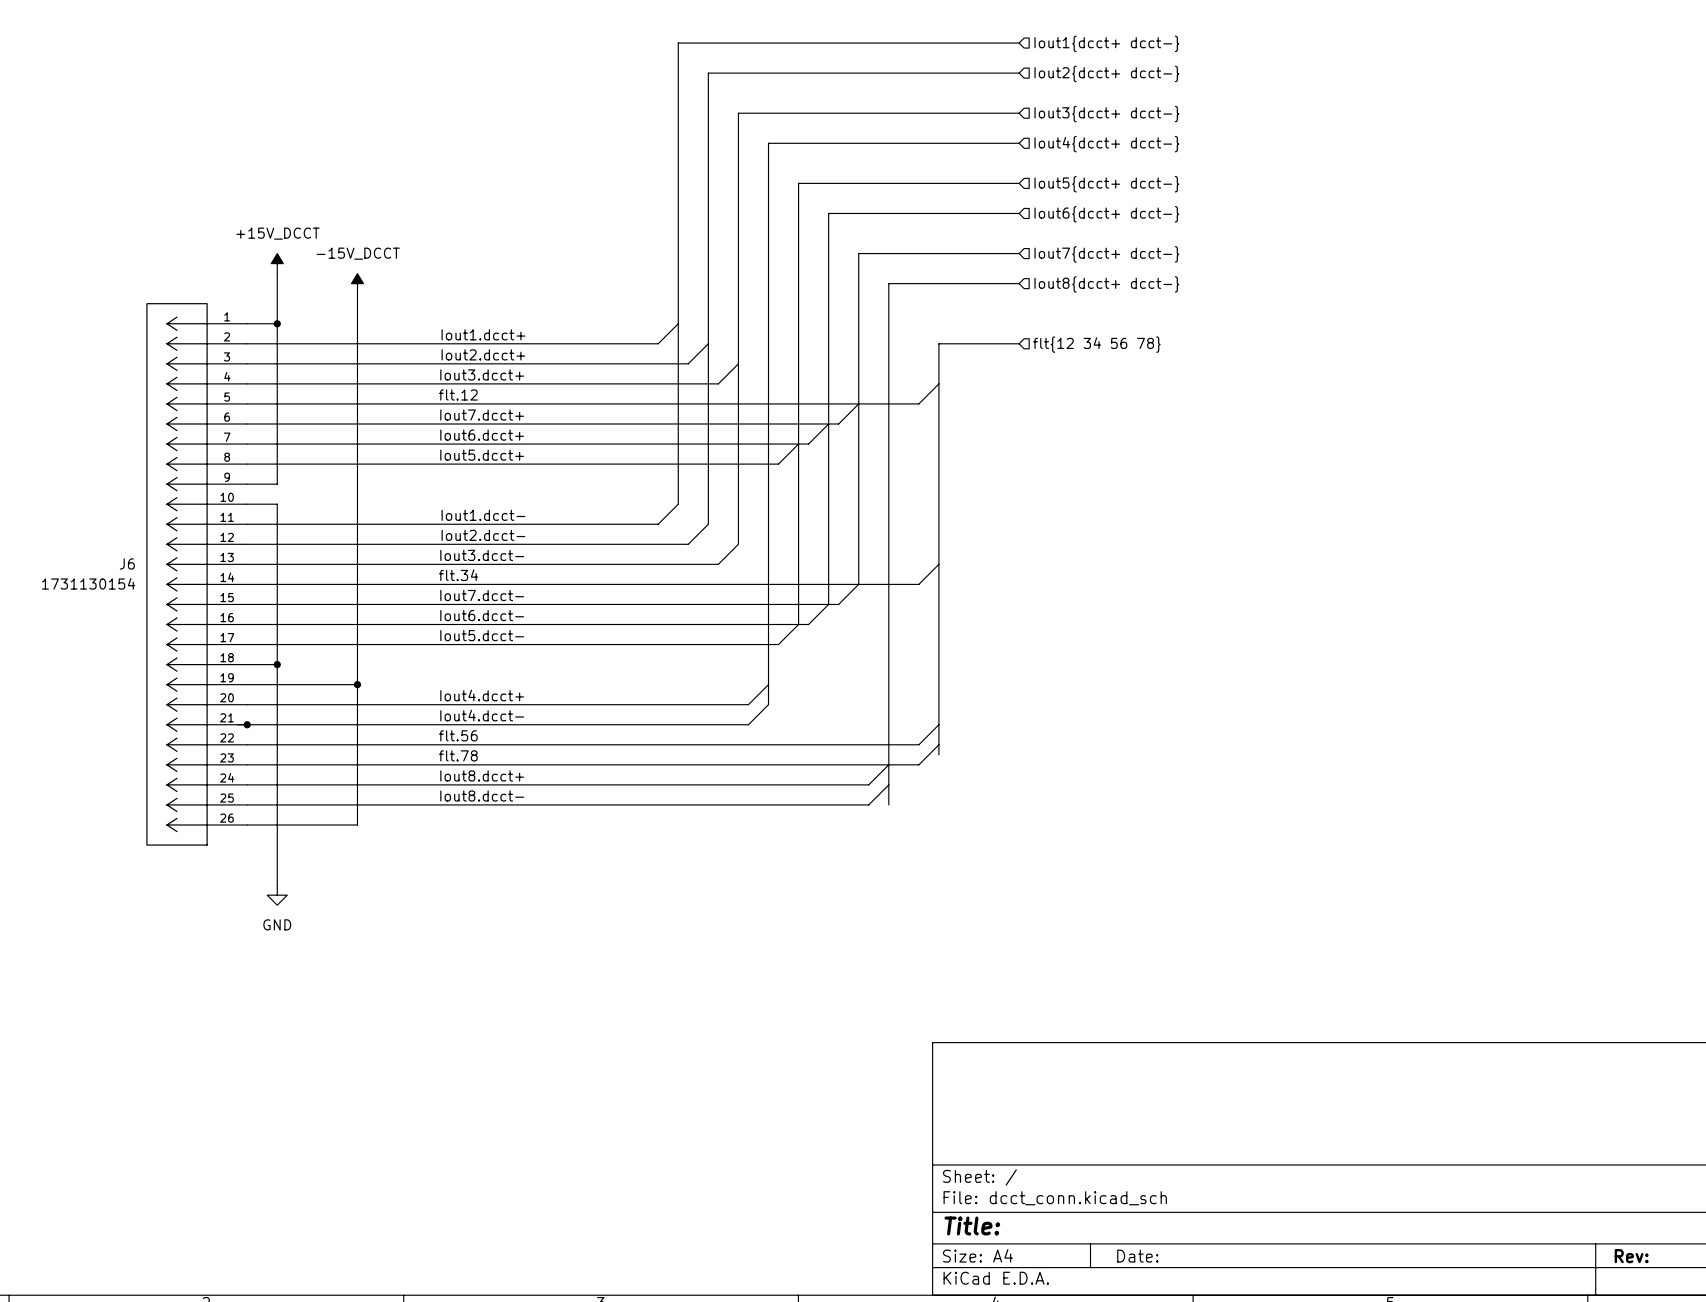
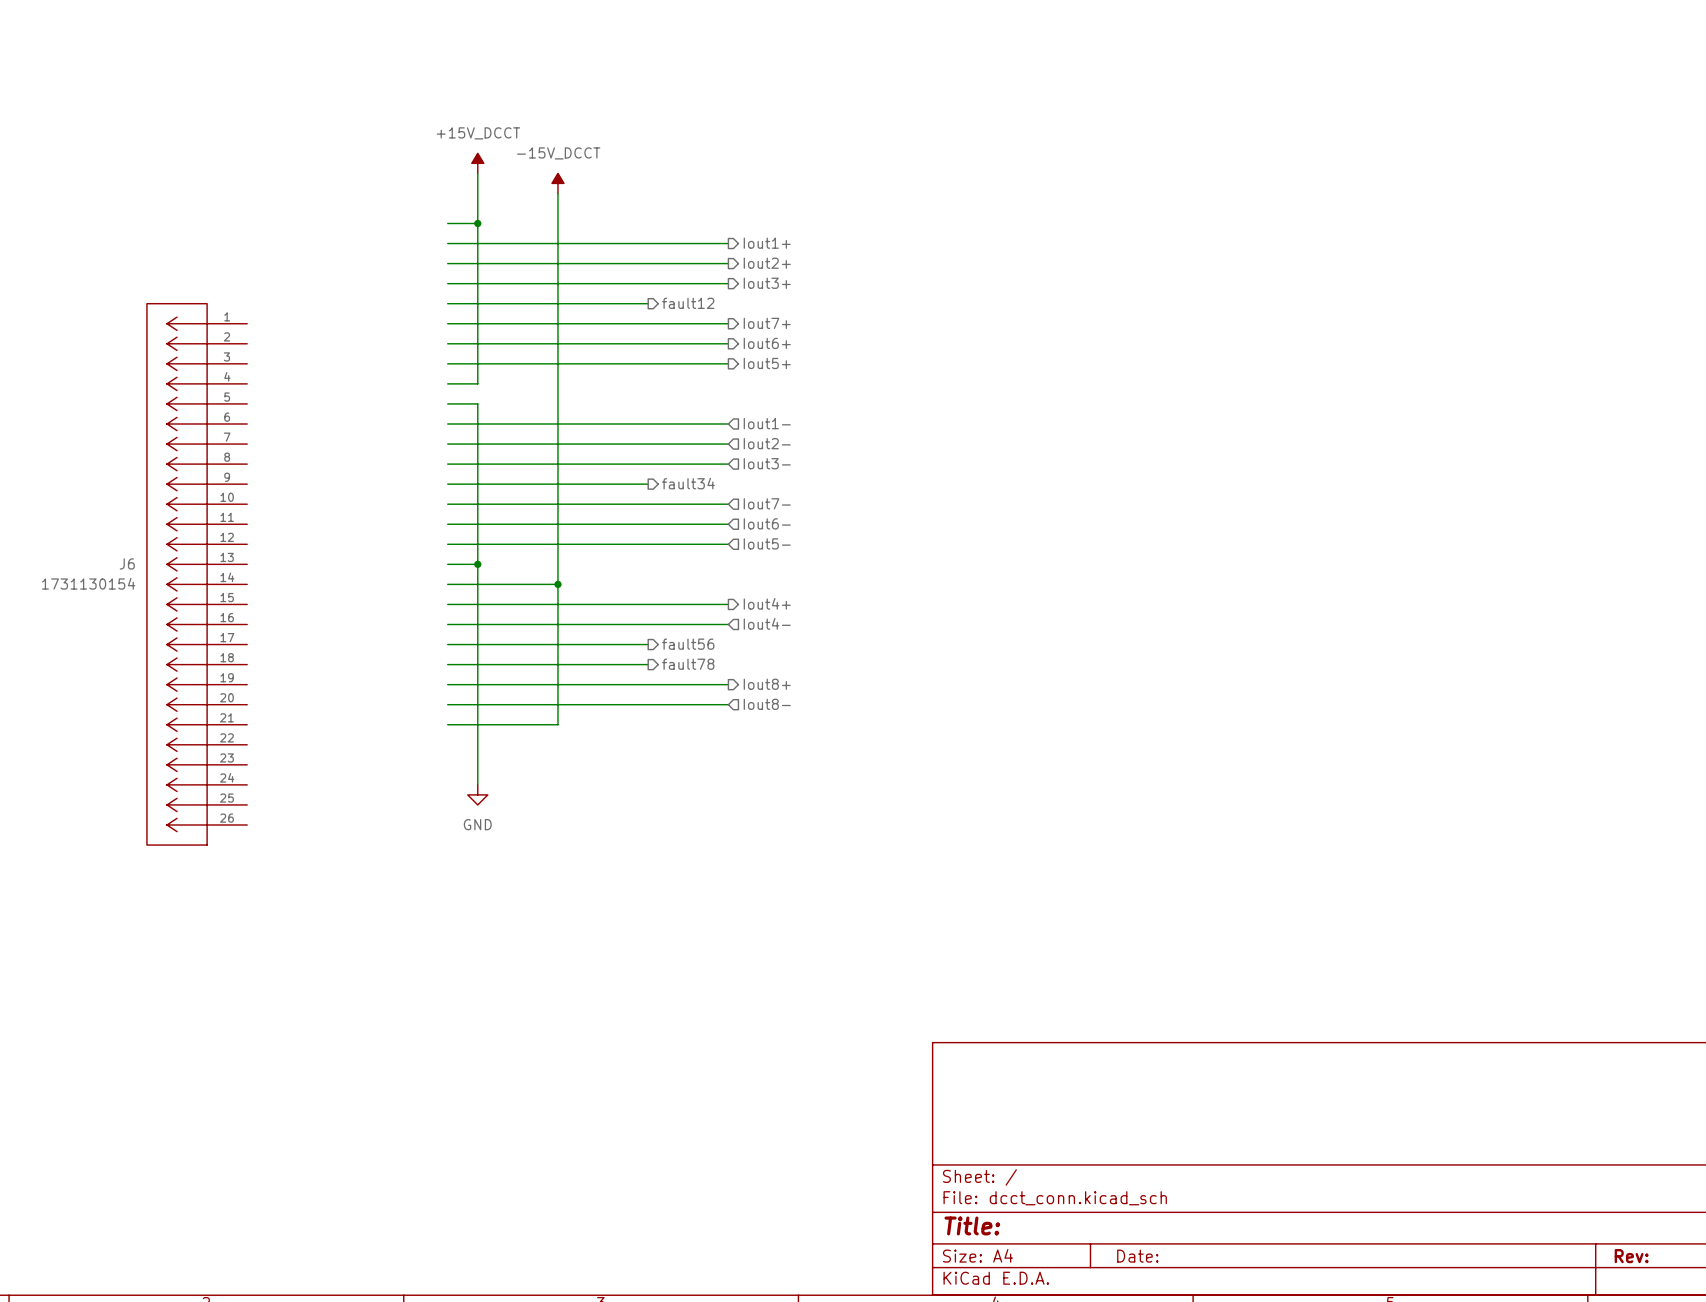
bus: (1019, 43) (678, 43) (678, 504) -> none
hierarchical label: Iout1{dcct+ dcct-} (1106, 43) -> none
bus: (1019, 73) (708, 73) (708, 524) -> none
hierarchical label: Iout2{dcct+ dcct-} (1106, 73) -> none
bus: (1019, 113) (738, 113) (738, 544) -> none
hierarchical label: Iout3{dcct+ dcct-} (1106, 114) -> none
bus: (1019, 143) (768, 143) (768, 704) -> none
hierarchical label: Iout4{dcct+ dcct-} (1106, 144) -> none
power symbol: none -> +15V_DCCT (477, 163)
power symbol: none -> -15V_DCCT (557, 183)
bus: (1019, 183) (798, 183) (798, 624) -> none
hierarchical label: Iout5{dcct+ dcct-} (1106, 184) -> none
bus: (1019, 213) (828, 213) (828, 604) -> none
hierarchical label: Iout6{dcct+ dcct-} (1106, 214) -> none
wire: none -> (447, 223) (477, 223)
junction: none -> (477, 223)
wire: none -> (447, 243) (728, 243)
hierarchical label: none -> Iout1+ (767, 243)
bus: (1019, 253) (858, 253) (858, 584) -> none
hierarchical label: Iout7{dcct+ dcct-} (1106, 254) -> none
power symbol: +15V_DCCT (277, 263) -> none
wire: none -> (447, 263) (728, 263)
hierarchical label: none -> Iout2+ (767, 263)
wire: (277, 273) (277, 484) (247, 484) -> none
power symbol: -15V_DCCT (357, 283) -> none
wire: none -> (447, 283) (728, 283)
hierarchical label: none -> Iout3+ (767, 283)
bus: (1019, 283) (888, 283) (888, 804) -> none
hierarchical label: Iout8{dcct+ dcct-} (1106, 284) -> none
wire: (357, 293) (357, 824) (247, 824) -> none
wire: none -> (447, 303) (648, 303)
hierarchical label: none -> fault12 (688, 303)
wire: (247, 323) (277, 323) -> none
junction: (277, 323) -> none
wire: none -> (447, 323) (728, 323)
wire: (678, 323) (658, 343) -> (728, 343) (658, 343)
hierarchical label: none -> Iout7+ (767, 323)
label: Iout1.dcct+ (483, 334) -> none
wire: (247, 343) (447, 343) -> none
wire: (708, 343) (688, 363) -> (728, 363) (688, 363)
hierarchical label: none -> Iout6+ (767, 343)
bus: (1019, 343) (938, 343) (938, 754) -> none
hierarchical label: flt{12 34 56 78} (1096, 344) -> none
label: Iout2.dcct+ (483, 354) -> none
wire: (247, 363) (447, 363) -> none
wire: (738, 363) (718, 383) (477, 383) -> (477, 173) (477, 383)
hierarchical label: none -> Iout5+ (767, 363)
label: Iout3.dcct+ (482, 374) -> none
wire: (247, 383) (447, 383) -> none
wire: (938, 383) (918, 403) (477, 403) -> (477, 784) (477, 403)
label: flt.12 (458, 395) -> none
wire: (247, 403) (447, 403) -> none
wire: (858, 403) (838, 423) (728, 423) -> none
label: Iout7.dcct+ (482, 415) -> none
wire: (247, 423) (447, 423) -> none
hierarchical label: none -> Iout1- (767, 423)
wire: (828, 423) (808, 444) (728, 444) -> none
label: Iout6.dcct+ (482, 435) -> none
hierarchical label: none -> Iout2- (767, 443)
wire: (247, 444) (447, 444) -> none
wire: (798, 444) (778, 464) (728, 464) -> none
label: Iout5.dcct+ (482, 455) -> none
hierarchical label: none -> Iout3- (767, 463)
wire: (247, 464) (447, 464) -> none
hierarchical label: none -> fault34 (688, 483)
wire: none -> (447, 484) (648, 484)
hierarchical label: none -> Iout7- (767, 503)
wire: (247, 504) (277, 504) (277, 885) -> none
wire: none -> (447, 504) (728, 504)
wire: (678, 504) (658, 524) -> (728, 524) (658, 524)
label: Iout1.dcct- (483, 515) -> none
hierarchical label: none -> Iout6- (767, 523)
wire: (247, 524) (447, 524) -> none
wire: (708, 524) (688, 544) -> (728, 544) (688, 544)
label: Iout2.dcct- (483, 535) -> none
hierarchical label: none -> Iout5- (767, 543)
wire: (247, 544) (447, 544) -> none
wire: (738, 544) (718, 564) (477, 564) -> none
label: Iout3.dcct- (482, 555) -> none
wire: (247, 564) (447, 564) -> none
junction: none -> (477, 564)
wire: (938, 564) (918, 584) (557, 584) -> none
label: flt.34 (458, 575) -> none
wire: (247, 584) (447, 584) -> none
junction: none -> (557, 584)
wire: (858, 584) (838, 604) (728, 604) -> none
label: Iout7.dcct- (482, 595) -> none
hierarchical label: none -> Iout4+ (767, 603)
wire: (247, 604) (447, 604) -> none
wire: (828, 604) (808, 624) (728, 624) -> none
label: Iout6.dcct- (482, 615) -> none
hierarchical label: none -> Iout4- (767, 623)
wire: (247, 624) (447, 624) -> none
wire: (798, 624) (778, 644) (648, 644) -> none
label: Iout5.dcct- (482, 635) -> none
wire: (247, 644) (447, 644) -> none
hierarchical label: none -> fault56 (688, 644)
wire: (247, 664) (277, 664) -> none
junction: (277, 664) -> none
wire: none -> (447, 664) (648, 664)
hierarchical label: none -> fault78 (688, 664)
wire: (247, 684) (357, 684) -> none
junction: (357, 684) -> none
wire: none -> (447, 684) (728, 684)
hierarchical label: none -> Iout8+ (767, 684)
wire: (768, 684) (748, 704) (728, 704) -> none
label: Iout4.dcct+ (482, 695) -> none
wire: (247, 704) (447, 704) -> none
hierarchical label: none -> Iout8- (767, 704)
wire: (768, 704) (748, 724) (557, 724) -> (557, 193) (557, 724)
label: Iout4.dcct- (482, 715) -> none
wire: (237, 724) (447, 724) -> none
junction: (247, 724) -> none
wire: (938, 724) (918, 744) (247, 744) -> none
label: flt.56 (458, 735) -> none
wire: (938, 744) (918, 764) (247, 764) -> none
label: flt.78 (458, 755) -> none
wire: (888, 764) (868, 784) (247, 784) -> none
label: Iout8.dcct+ (482, 775) -> none
wire: (888, 784) (868, 804) (247, 804) -> none
power symbol: none -> GND (477, 794)
label: Iout8.dcct- (482, 796) -> none
power symbol: GND (277, 895) -> none

